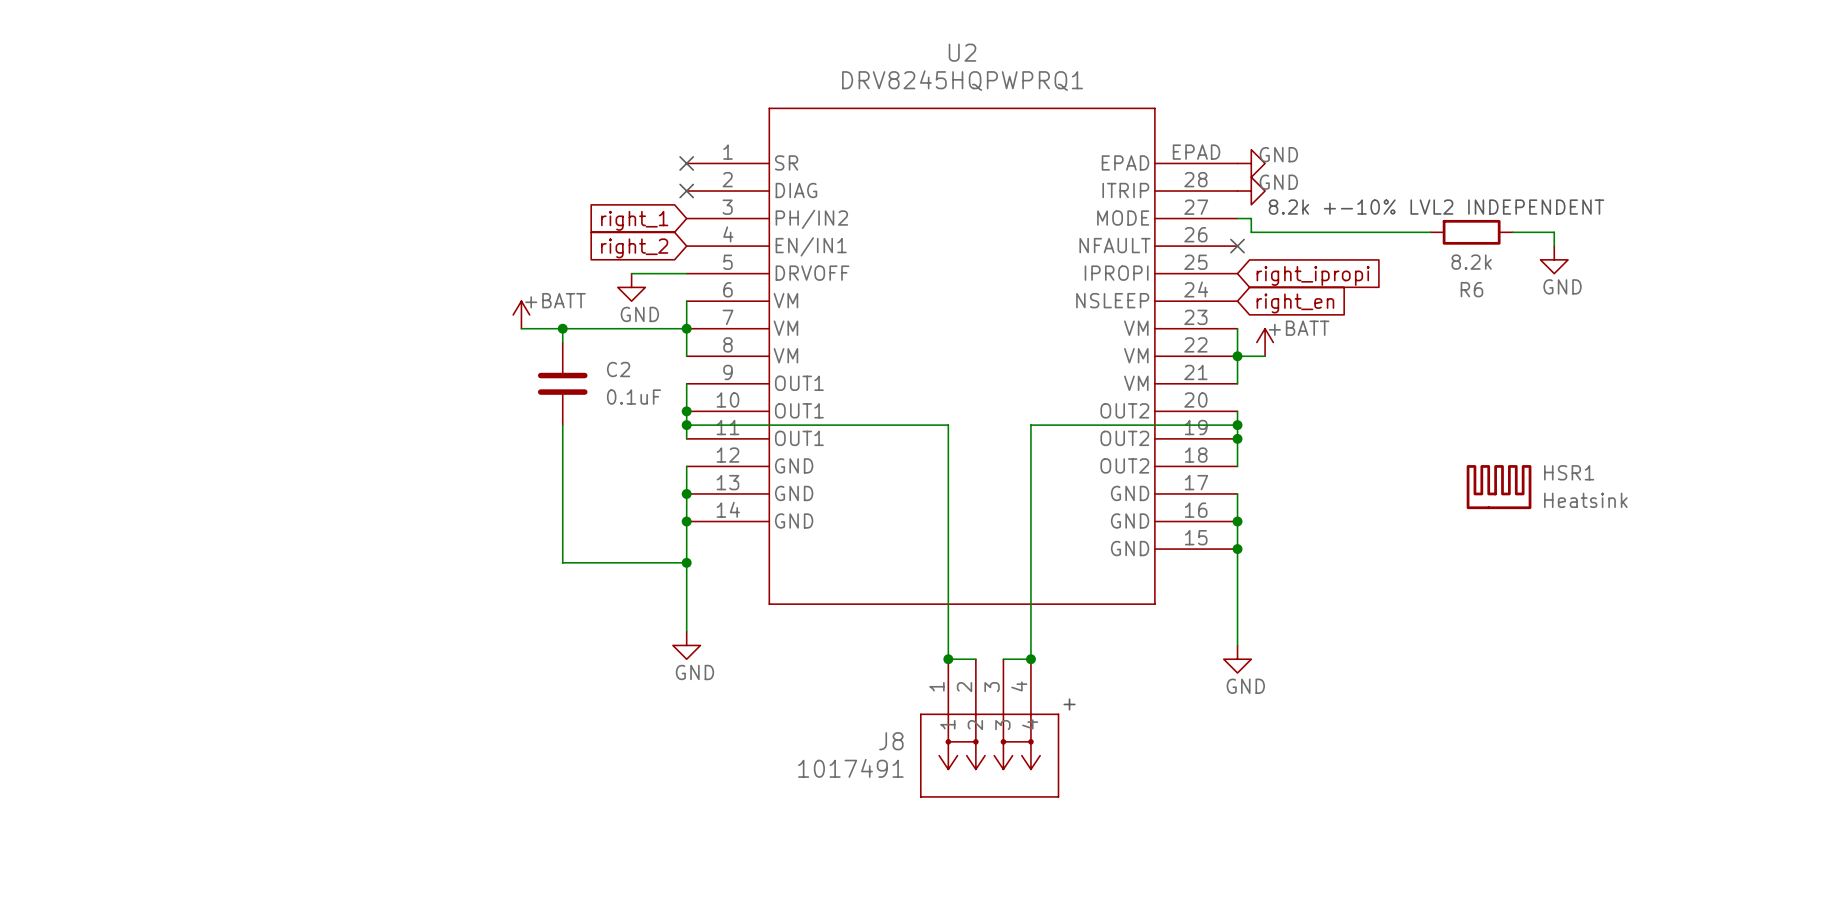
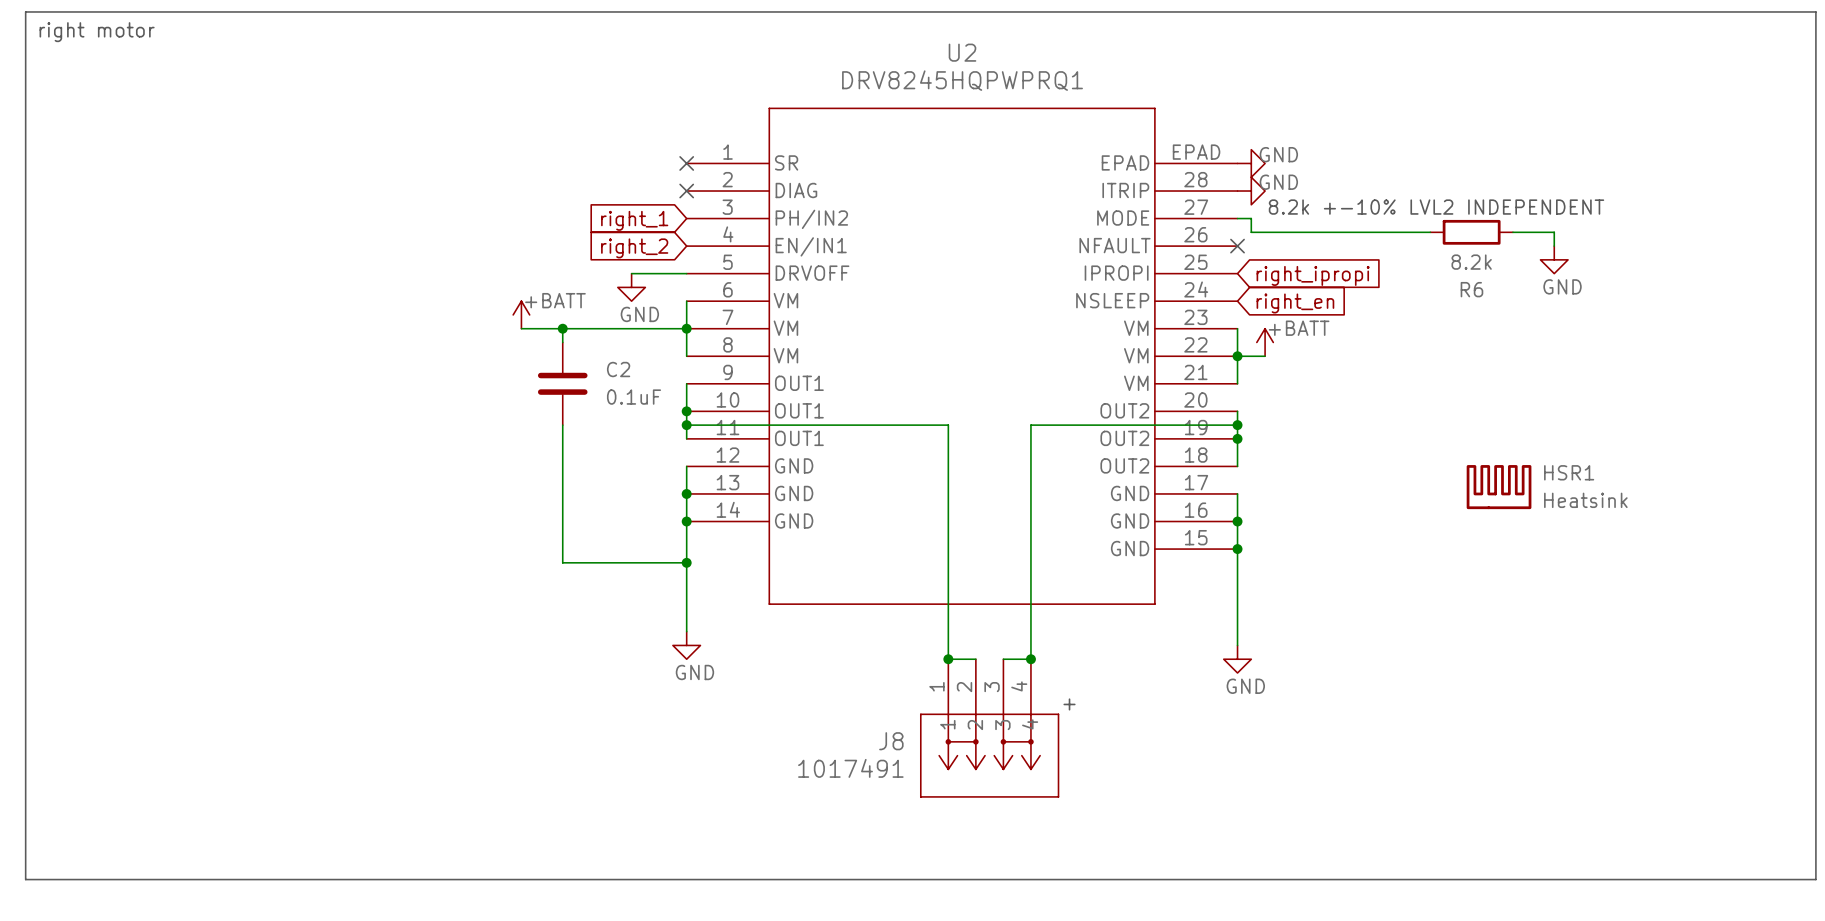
line: none -> (25, 11) (1815, 11) (1815, 879) (25, 879) (25, 11)
text: none -> right motor (97, 32)

